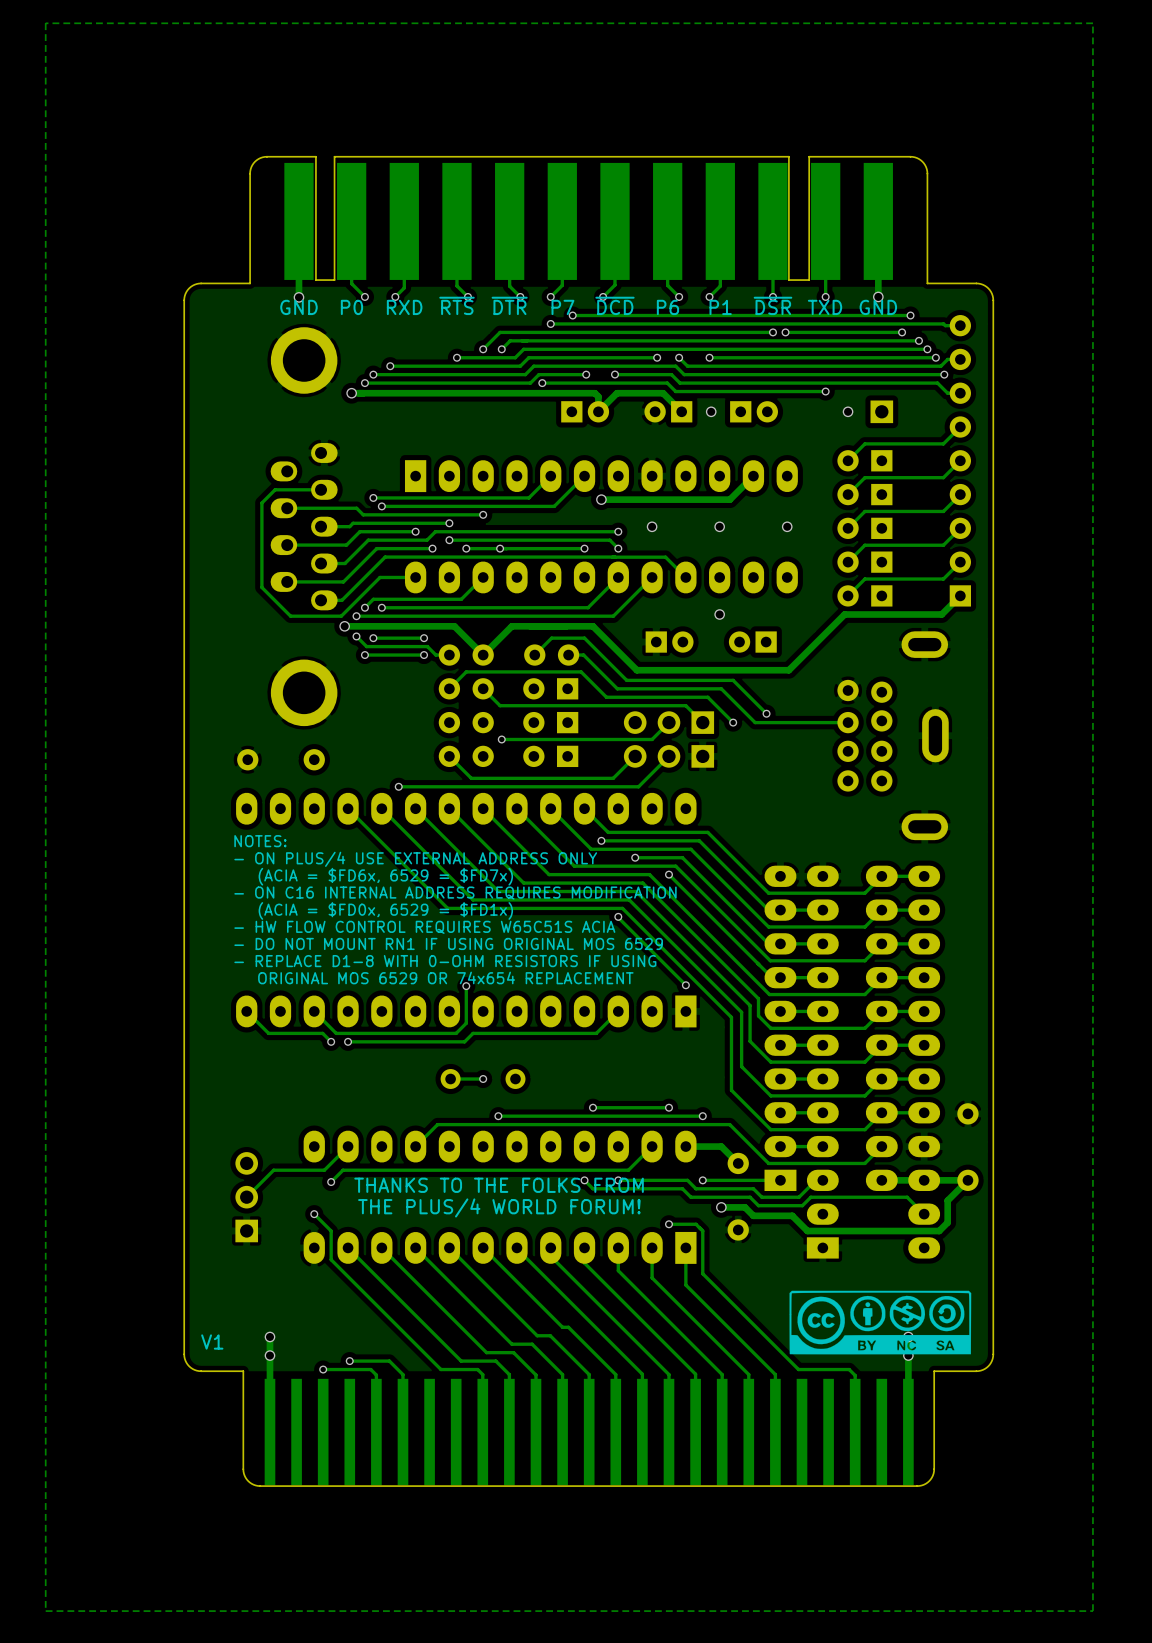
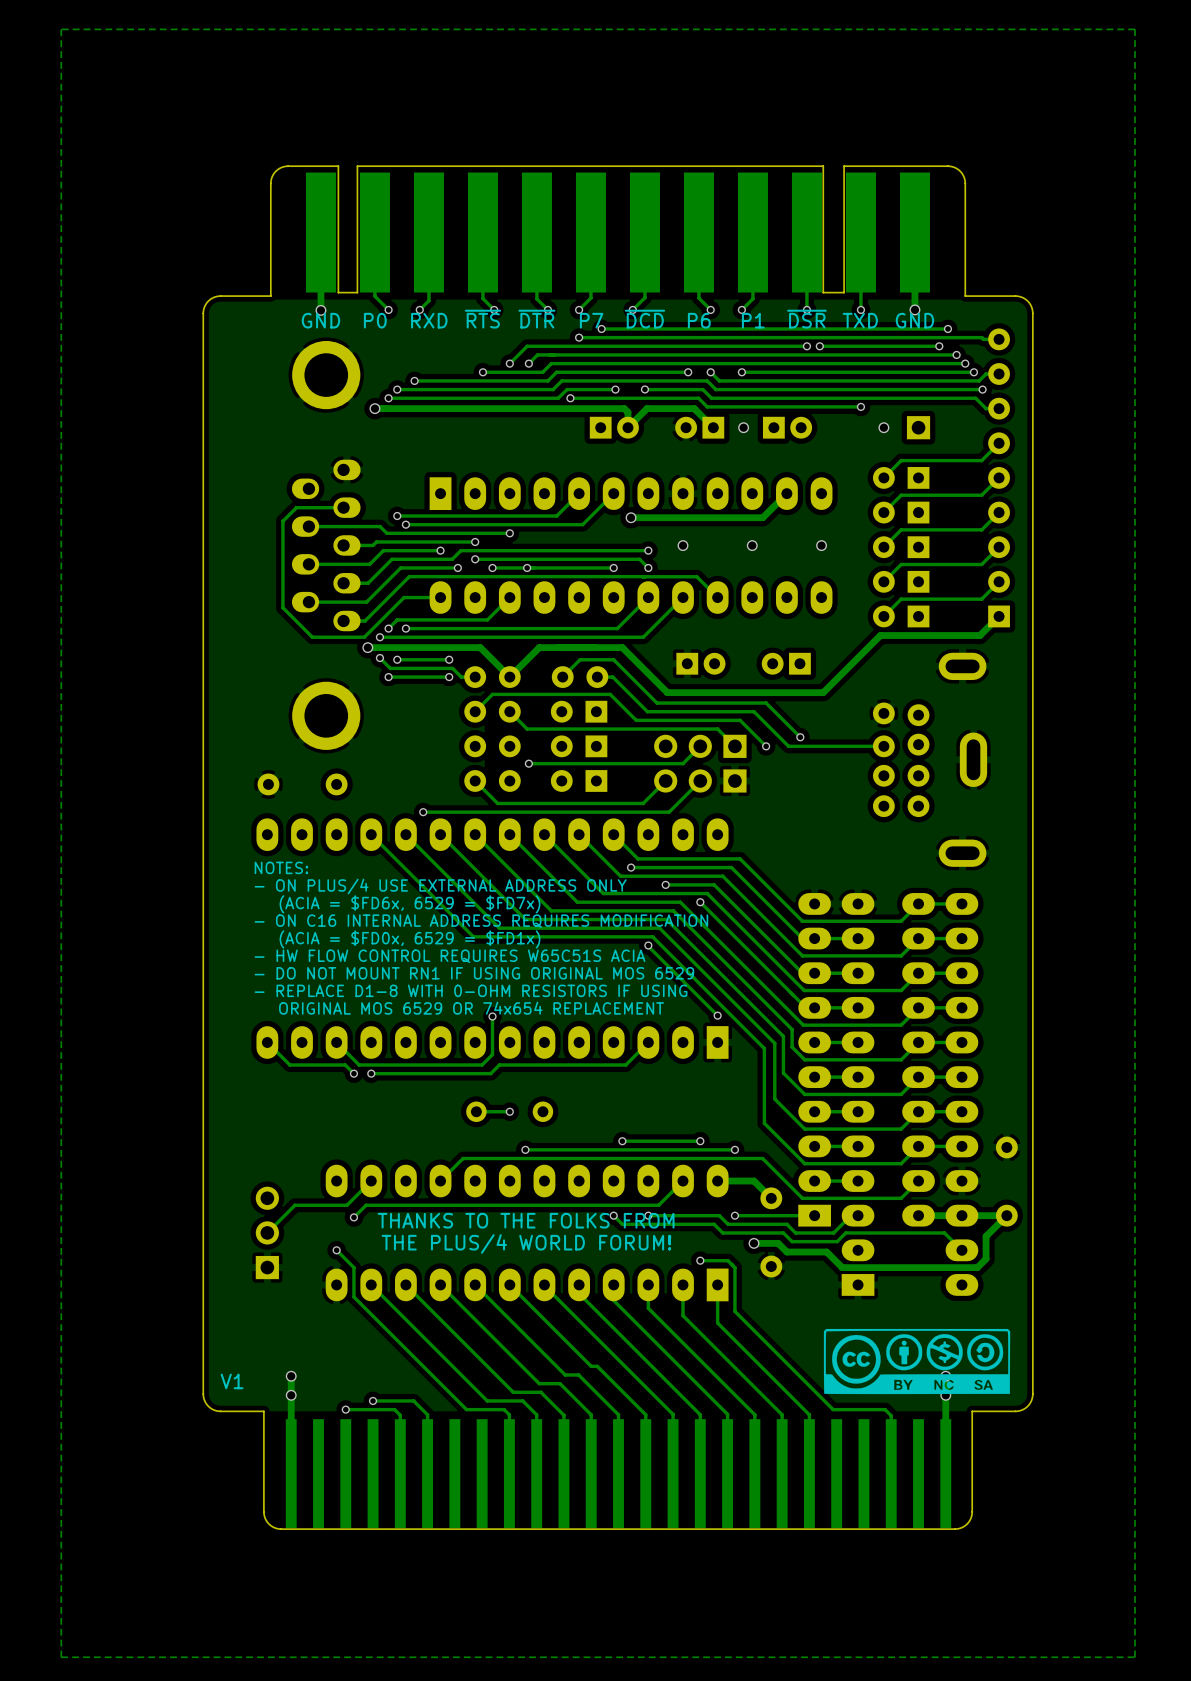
via: (719, 614) -> none

